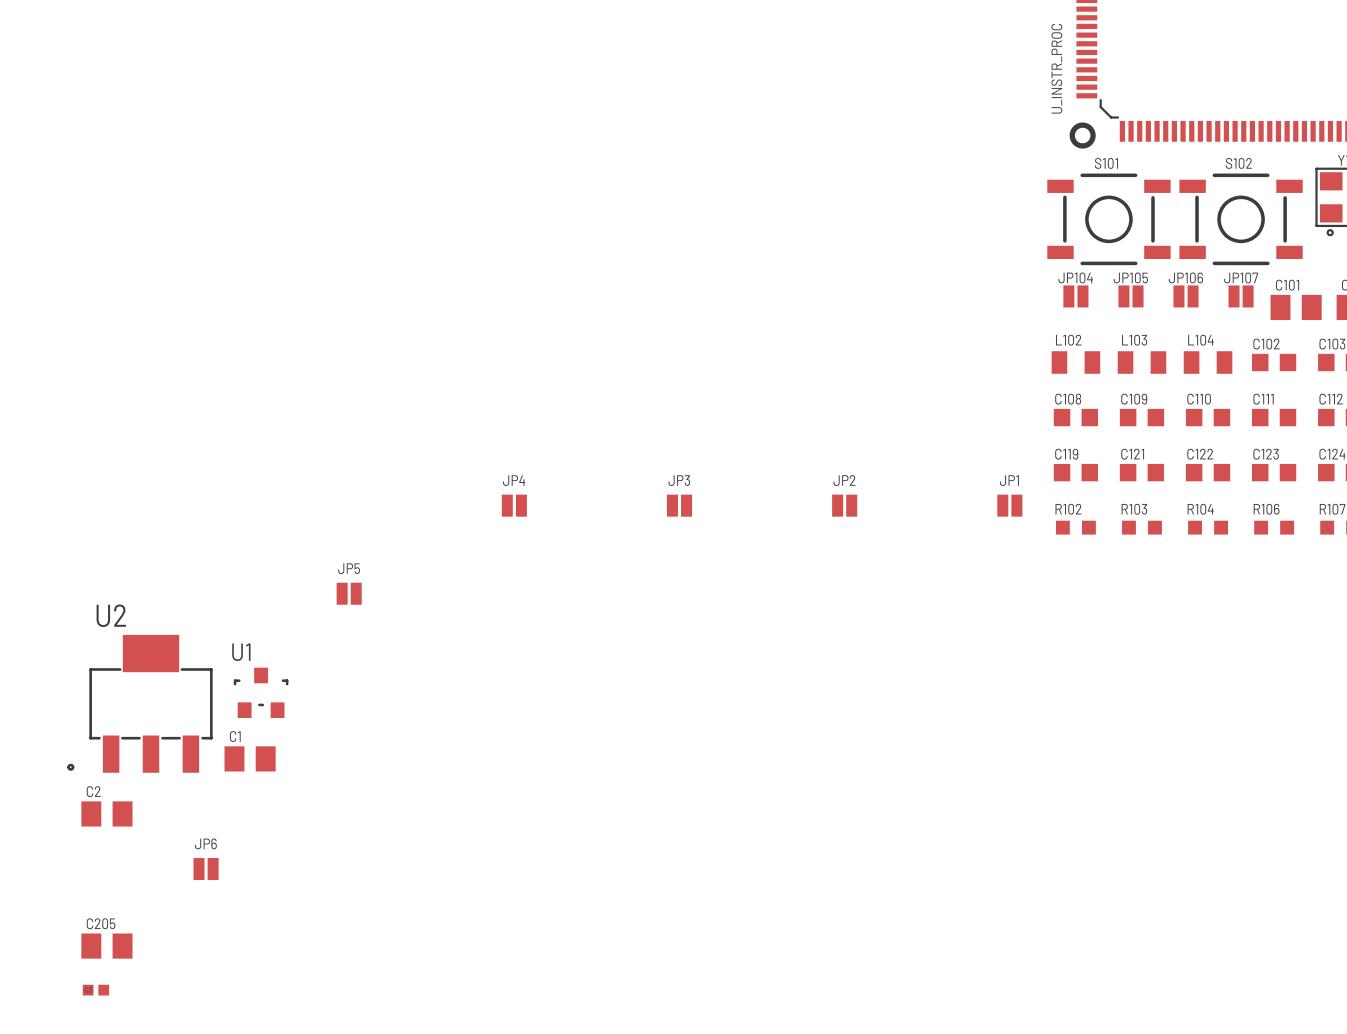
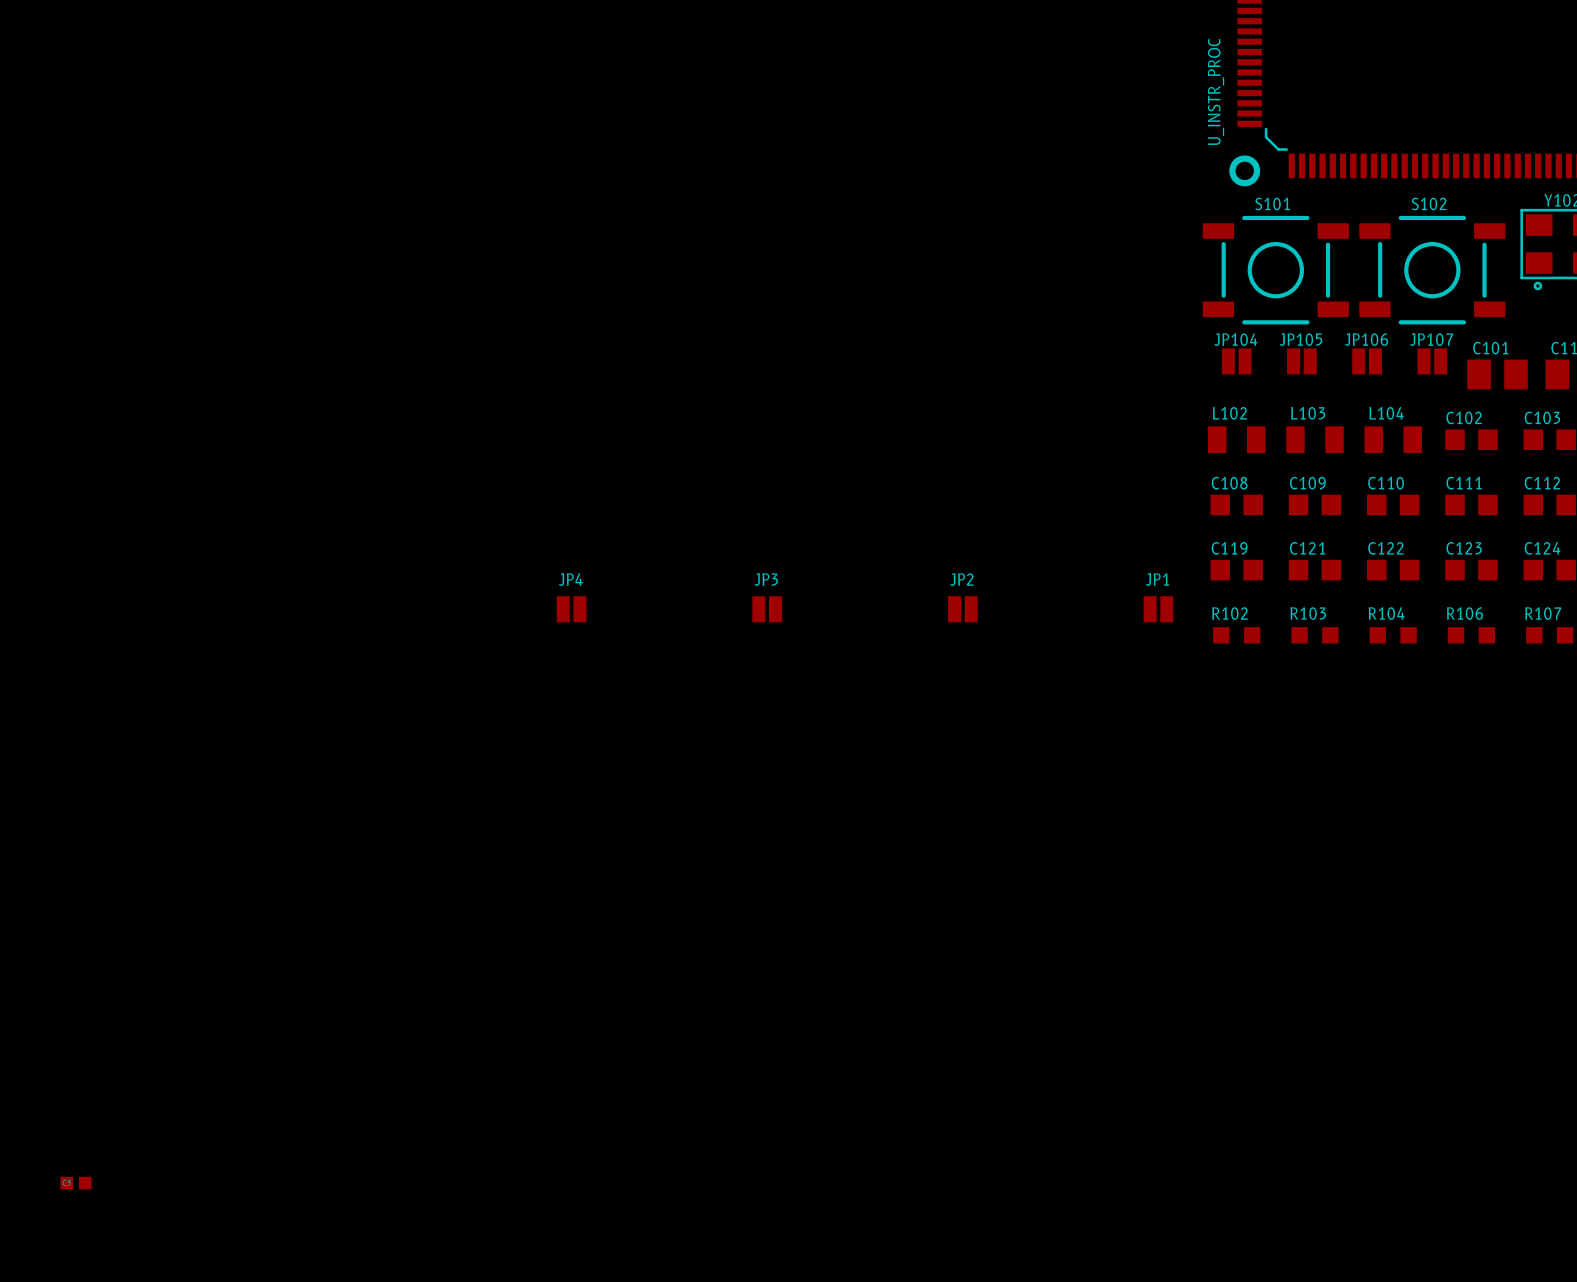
JP5: (349, 593) -> none
U1: (261, 692) -> none
U2: (139, 703) -> none
C1: (250, 758) -> none
C2: (106, 813) -> none
JP6: (206, 869) -> none
C205: (106, 946) -> none

